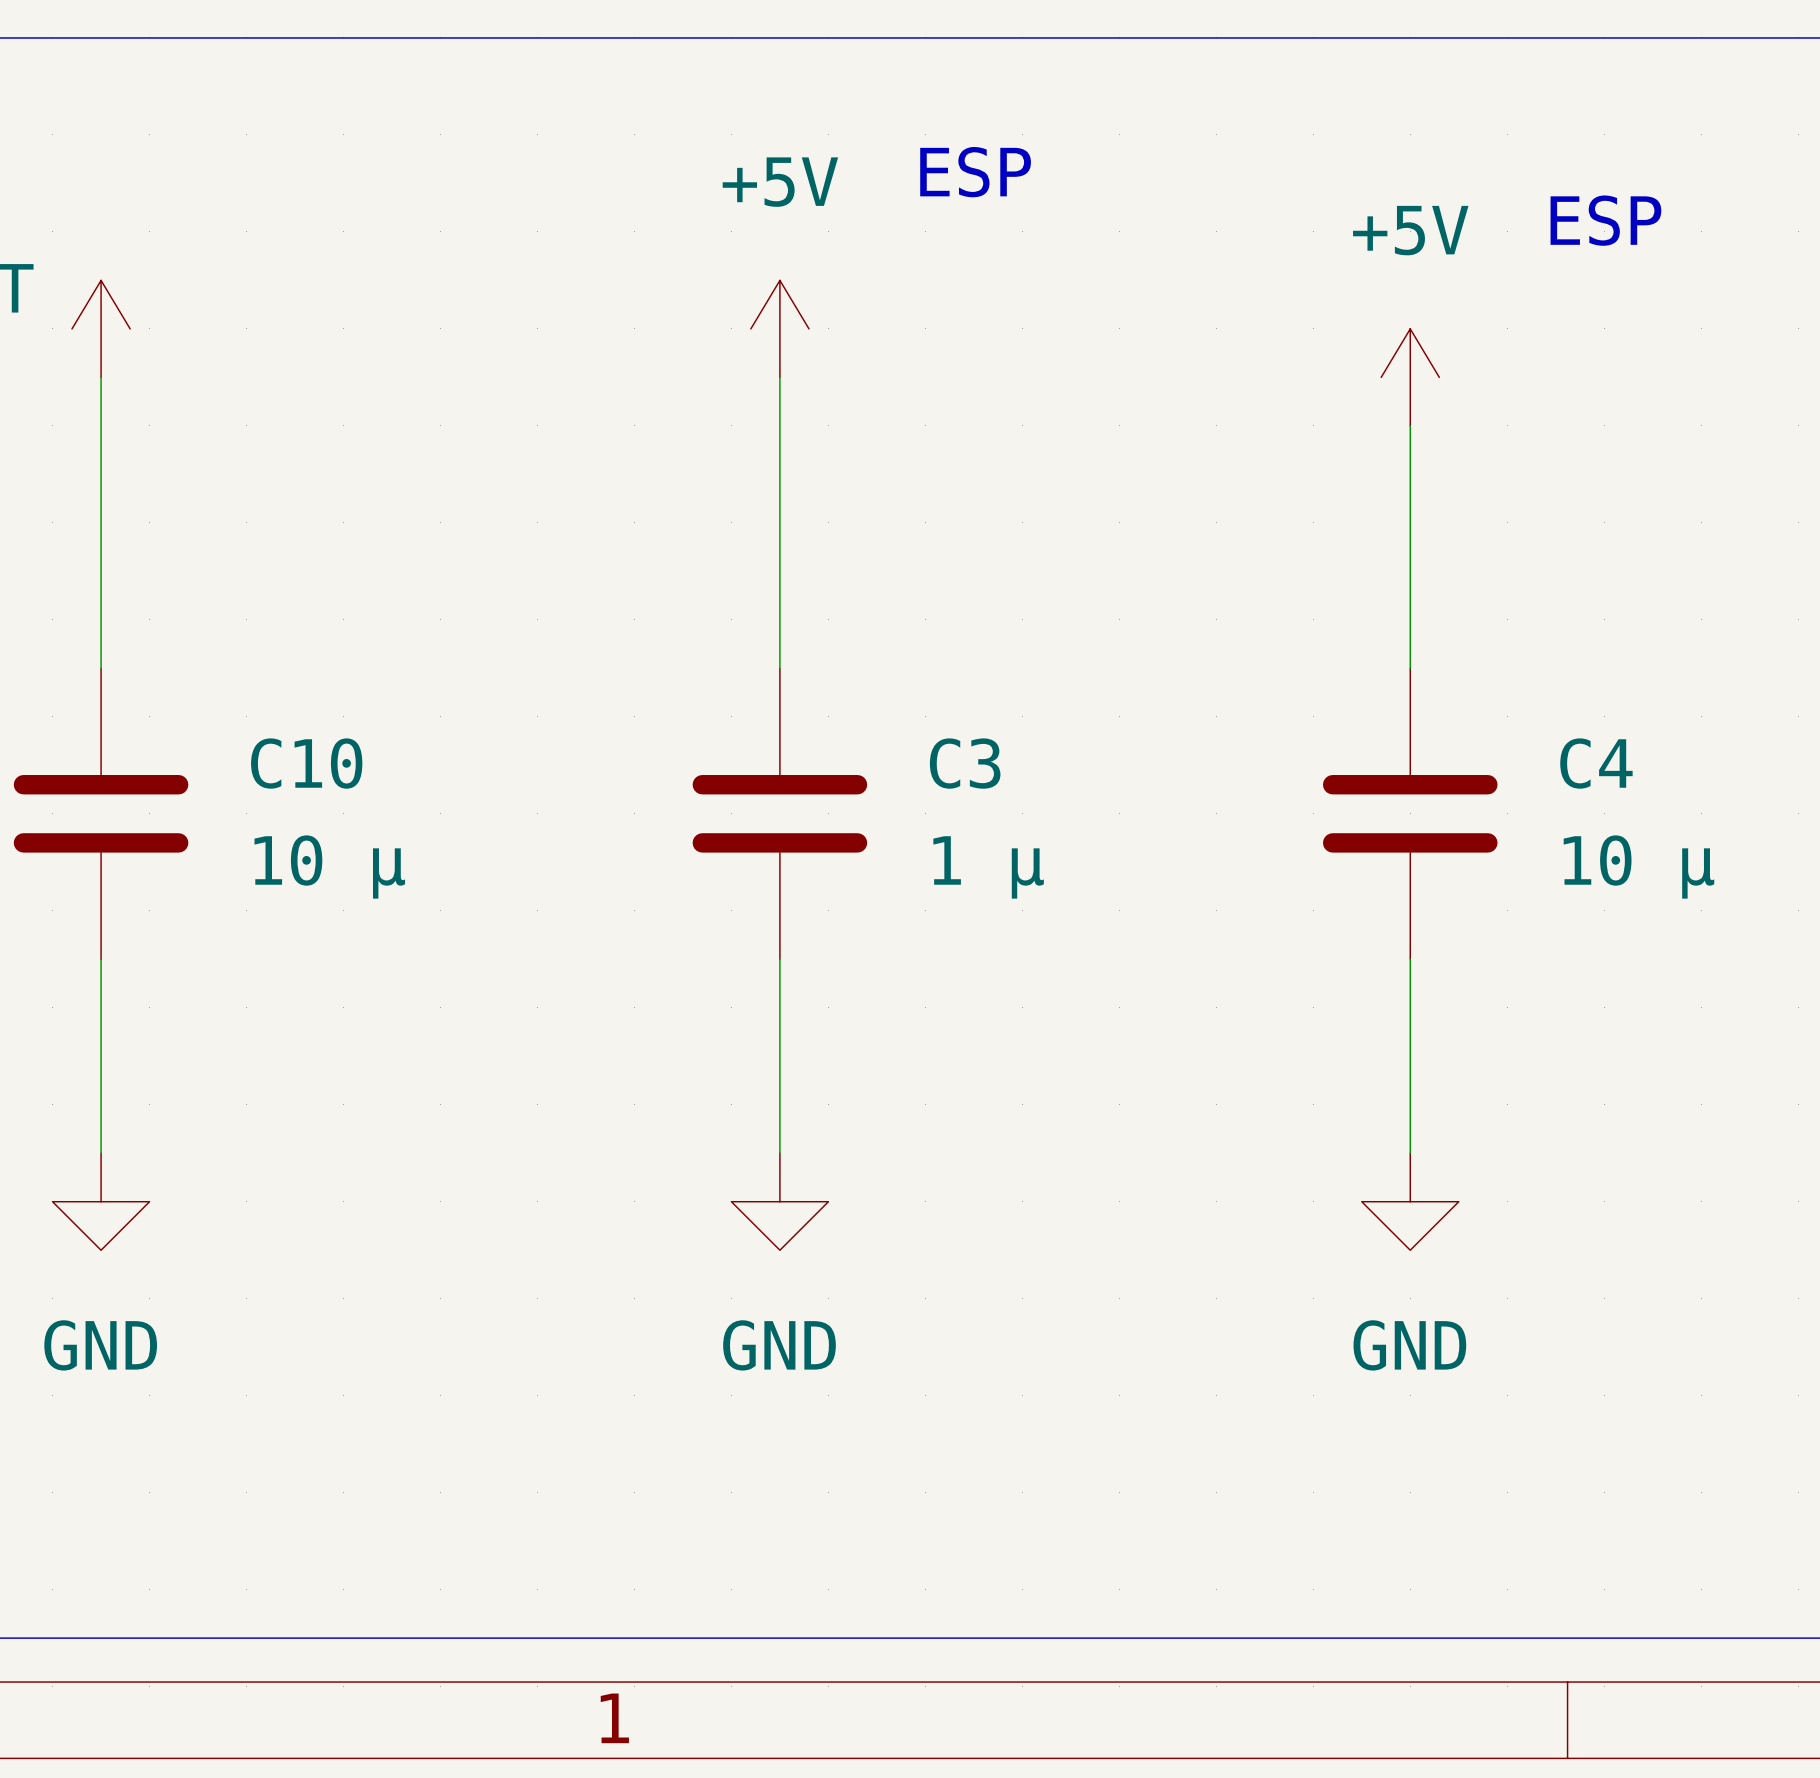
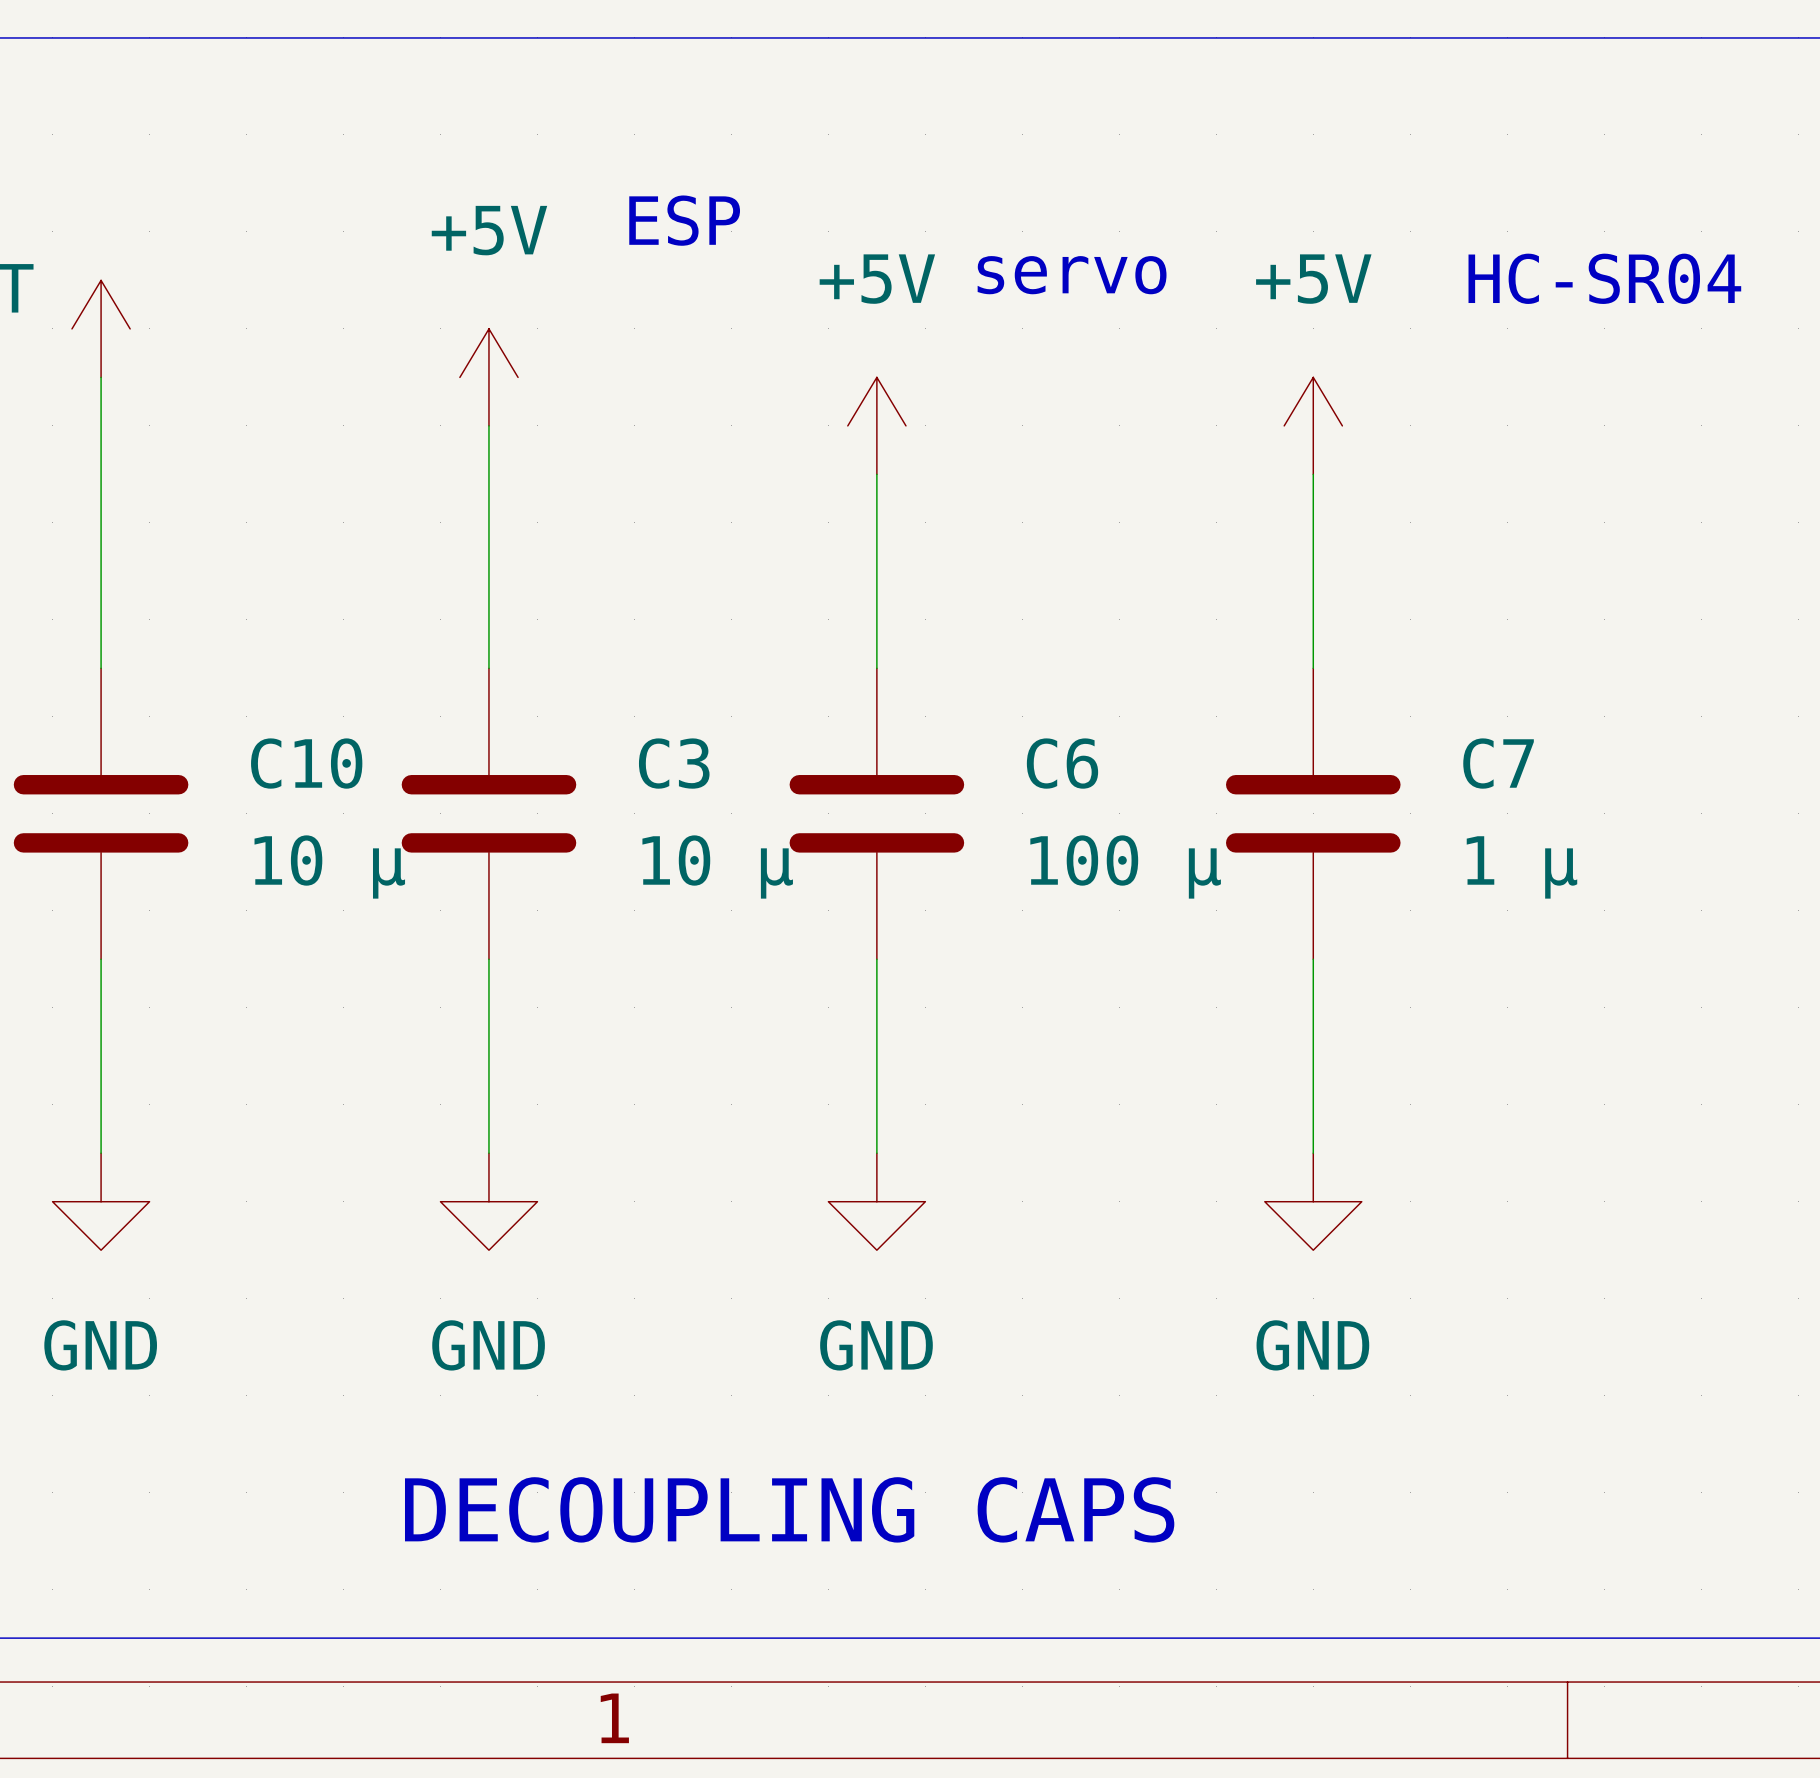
text position: ESP (975, 172) -> ESP (684, 220)
text: ESP (1605, 220) -> none
text: none -> servo (1072, 275)
text: none -> HC-SR04 (1604, 278)
power symbol position: +5V (779, 328) -> +5V (876, 425)
power symbol: none -> +5V (488, 377)
wire: (779, 377) (779, 668) -> none
power symbol position: +5V (1410, 377) -> +5V (1313, 425)
wire: (1410, 425) (1410, 668) -> (488, 425) (488, 668)
wire: none -> (876, 474) (876, 668)
wire: none -> (1313, 474) (1313, 668)
C3 position: (779, 813) -> (488, 813)
C6: none -> 100 μ (876, 813)
C7: none -> 1 μ (1313, 813)
C4: 10 μ (1410, 813) -> none
C3 value: 1 μ (988, 867) -> 10 μ (717, 866)
wire: (779, 959) (779, 1153) -> (876, 959) (876, 1153)
wire: none -> (1313, 959) (1313, 1153)
wire: (1410, 959) (1410, 1153) -> (488, 959) (488, 1153)
power symbol: none -> GND (488, 1201)
power symbol position: GND (779, 1201) -> GND (876, 1201)
power symbol position: GND (1410, 1201) -> GND (1313, 1201)
text: none -> DECOUPLING CAPS (789, 1509)

